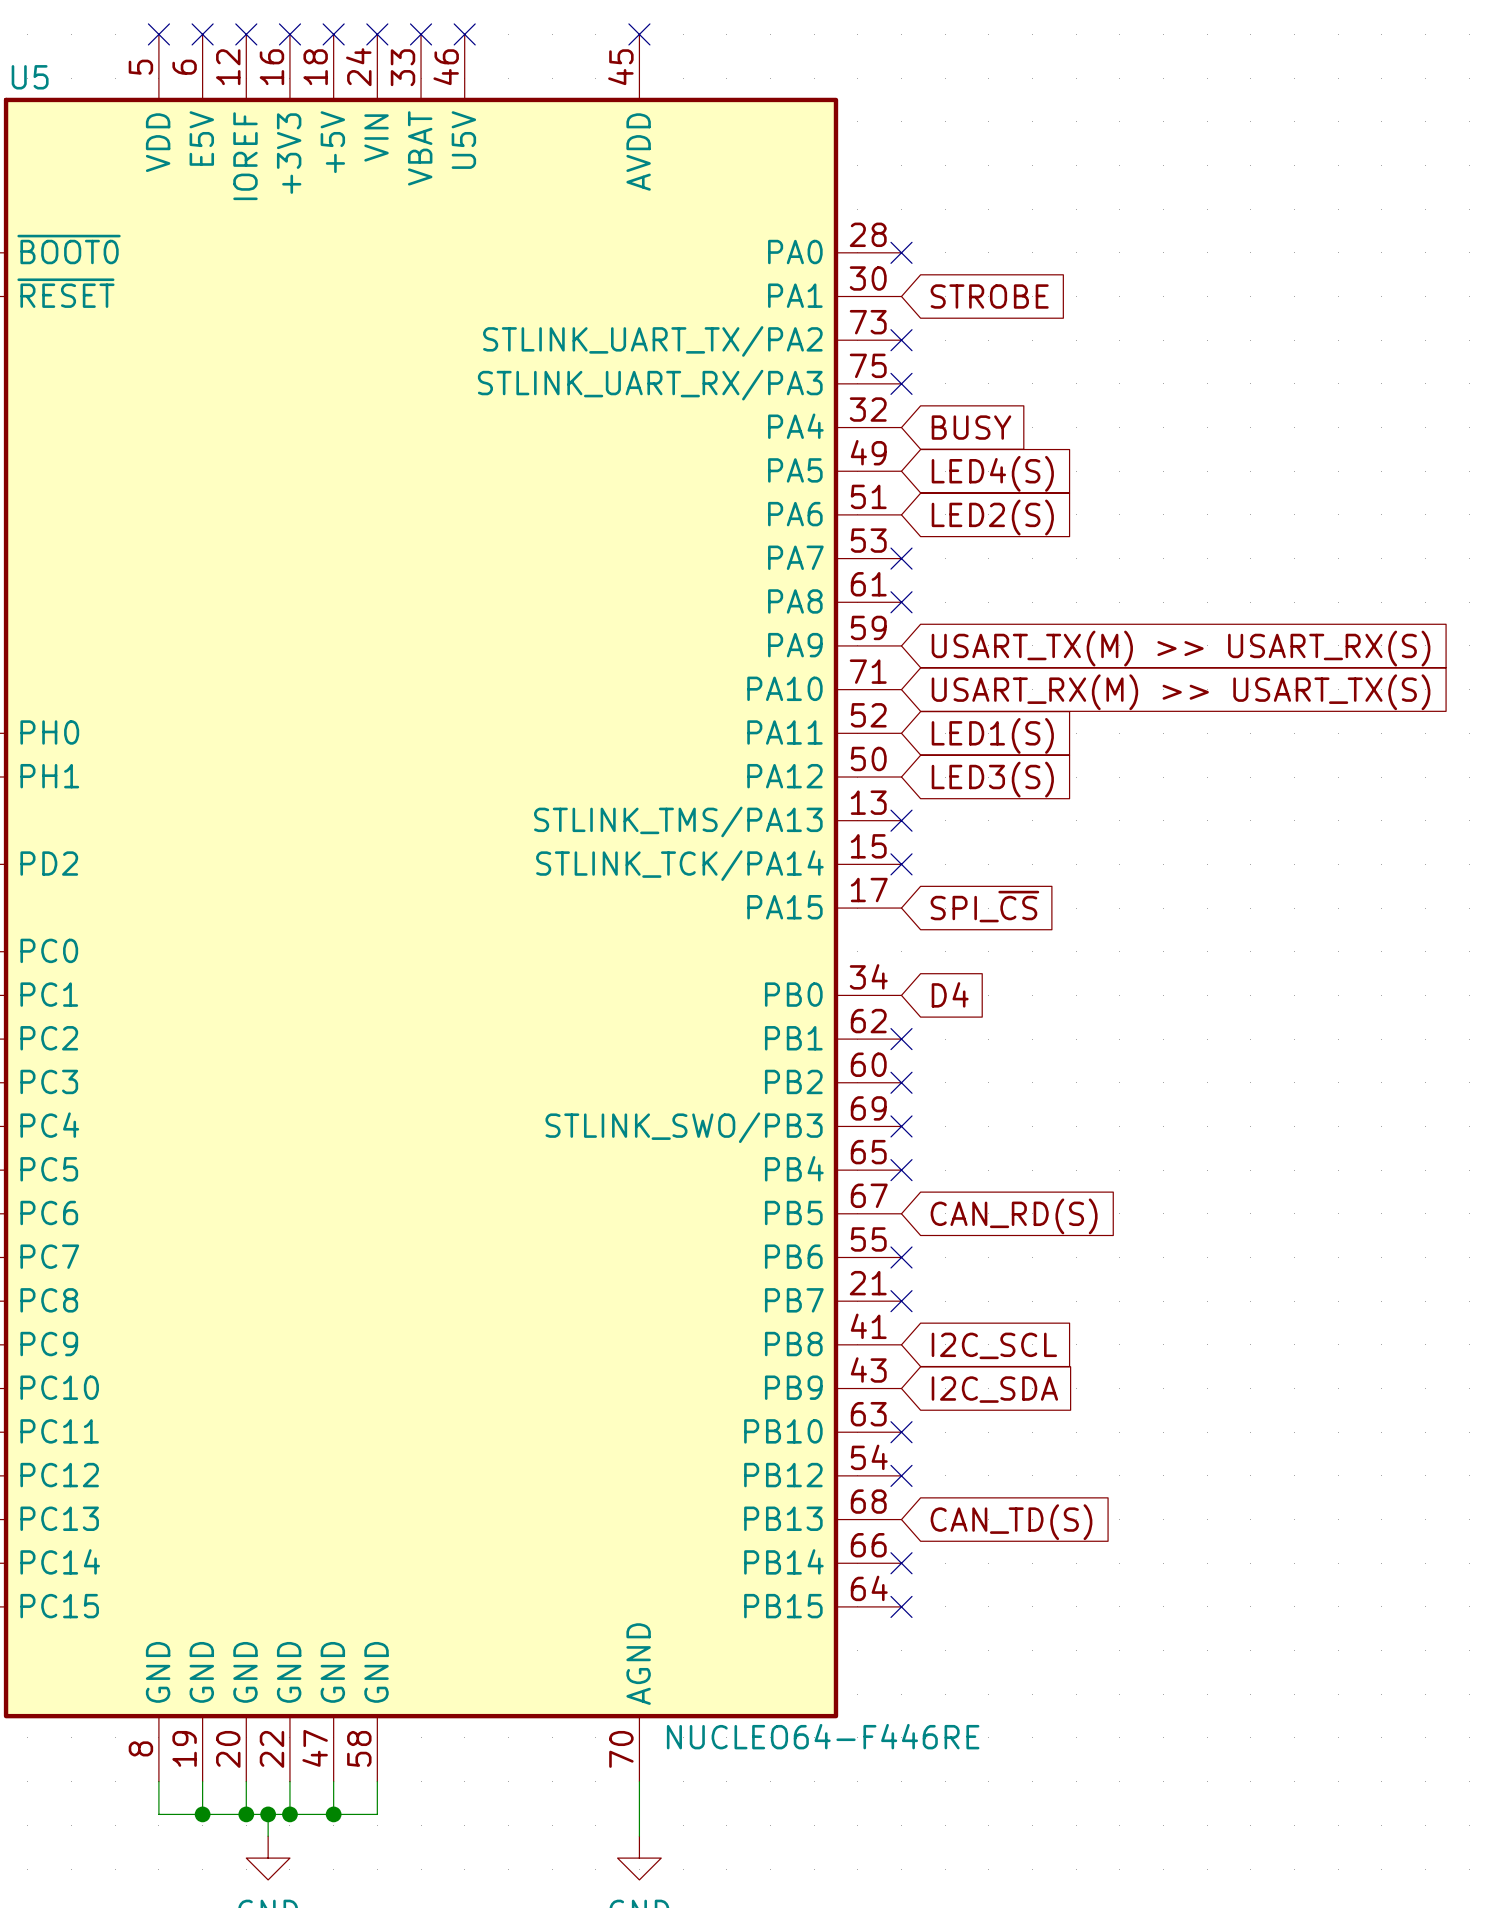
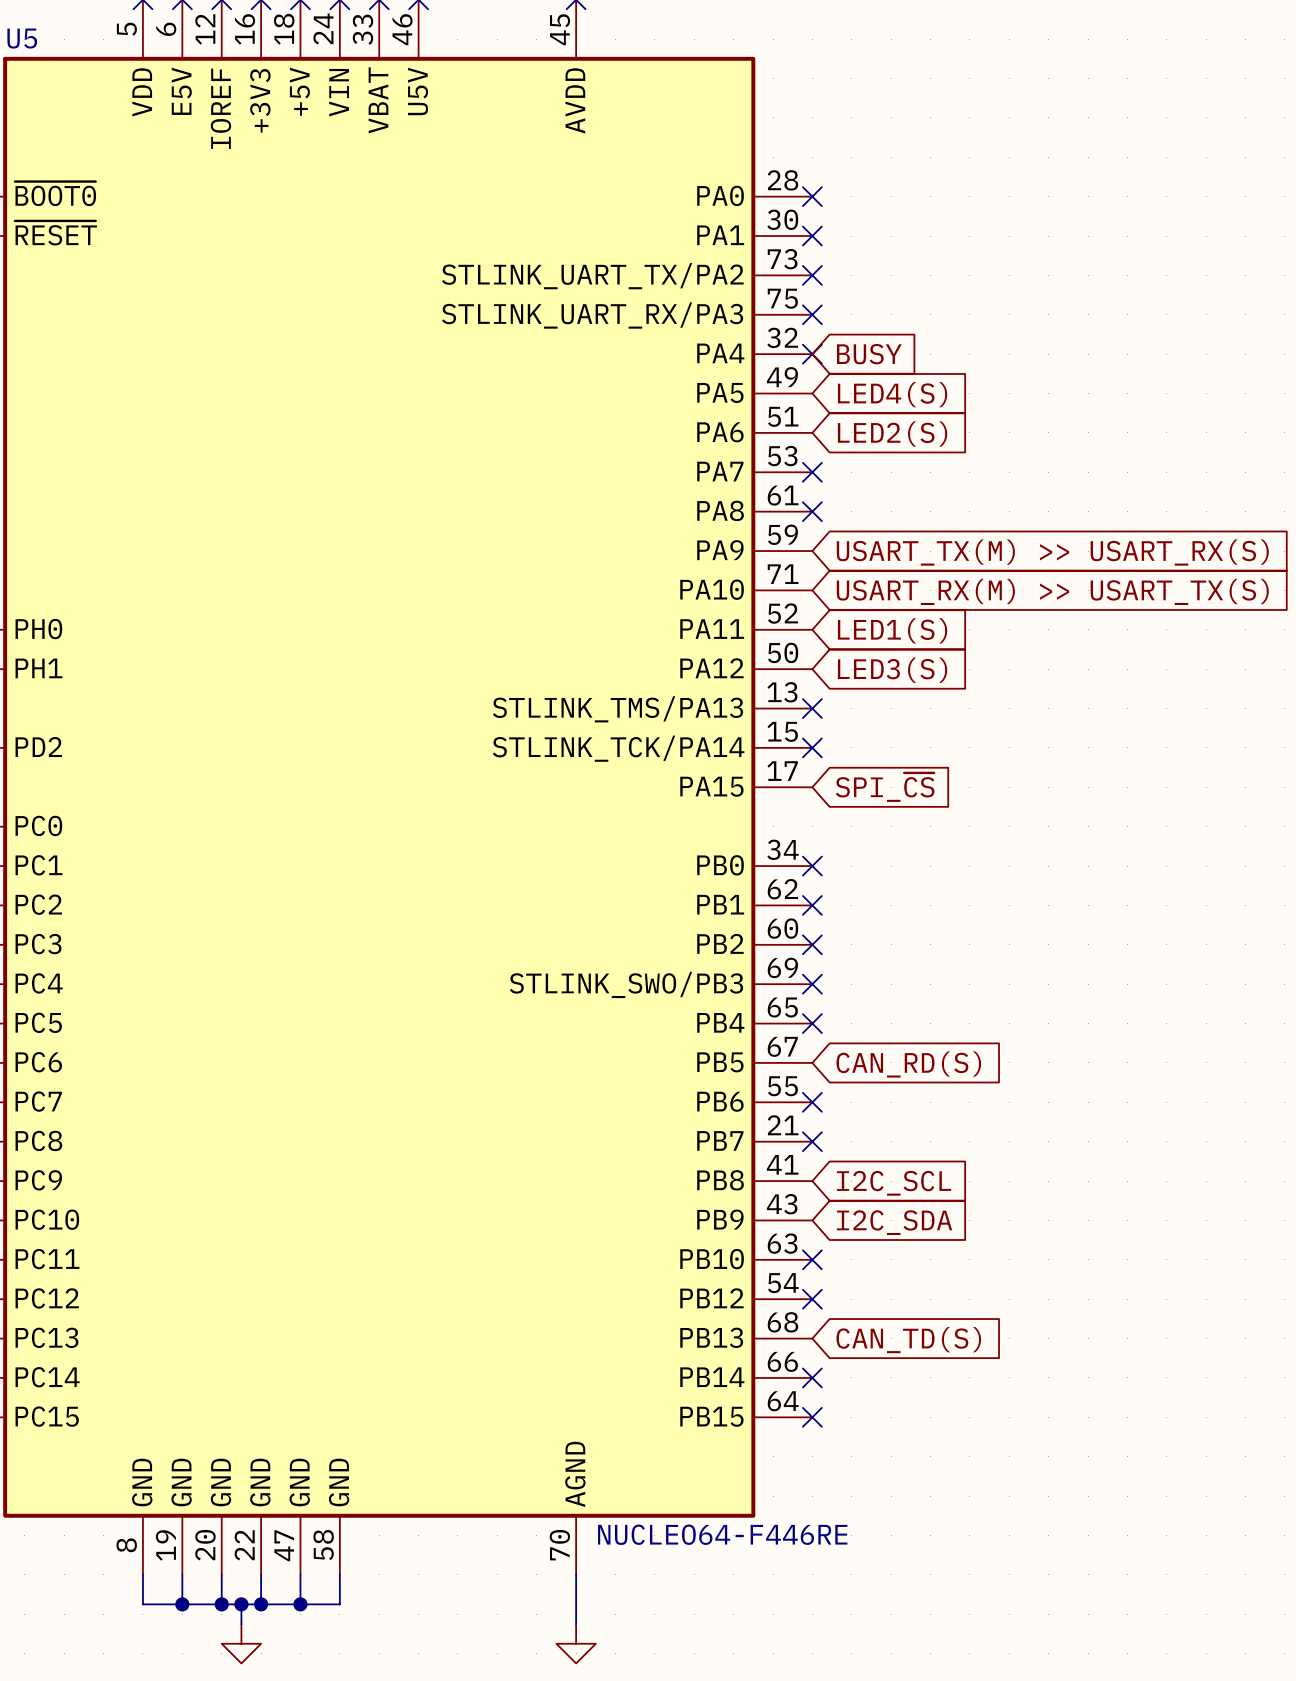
no-connect mark: none -> (812, 236)
global label: STROBE (989, 296) -> none
no-connect mark: none -> (812, 354)
global label: D4 (950, 994) -> none
no-connect mark: none -> (812, 866)

